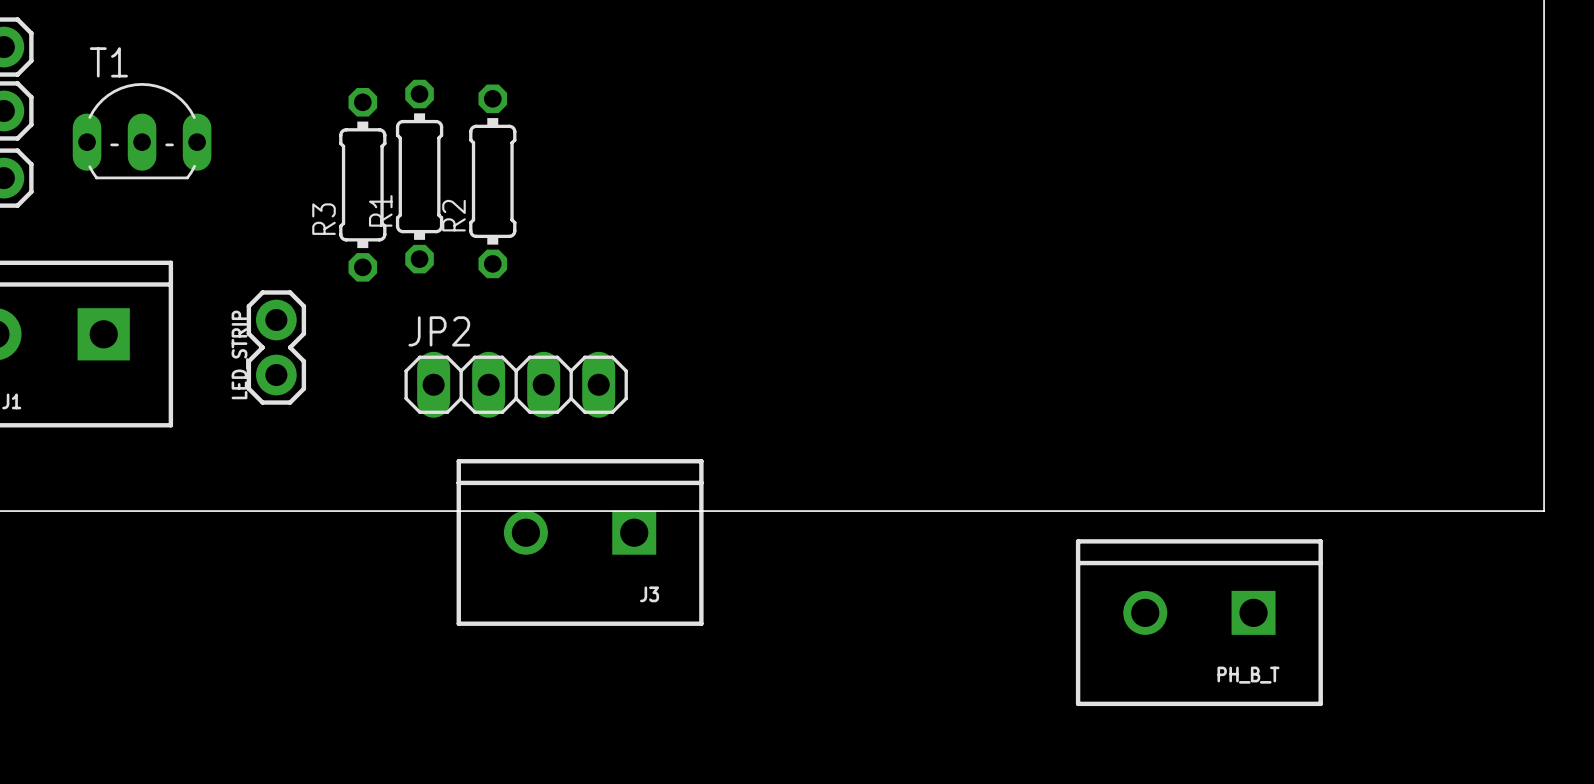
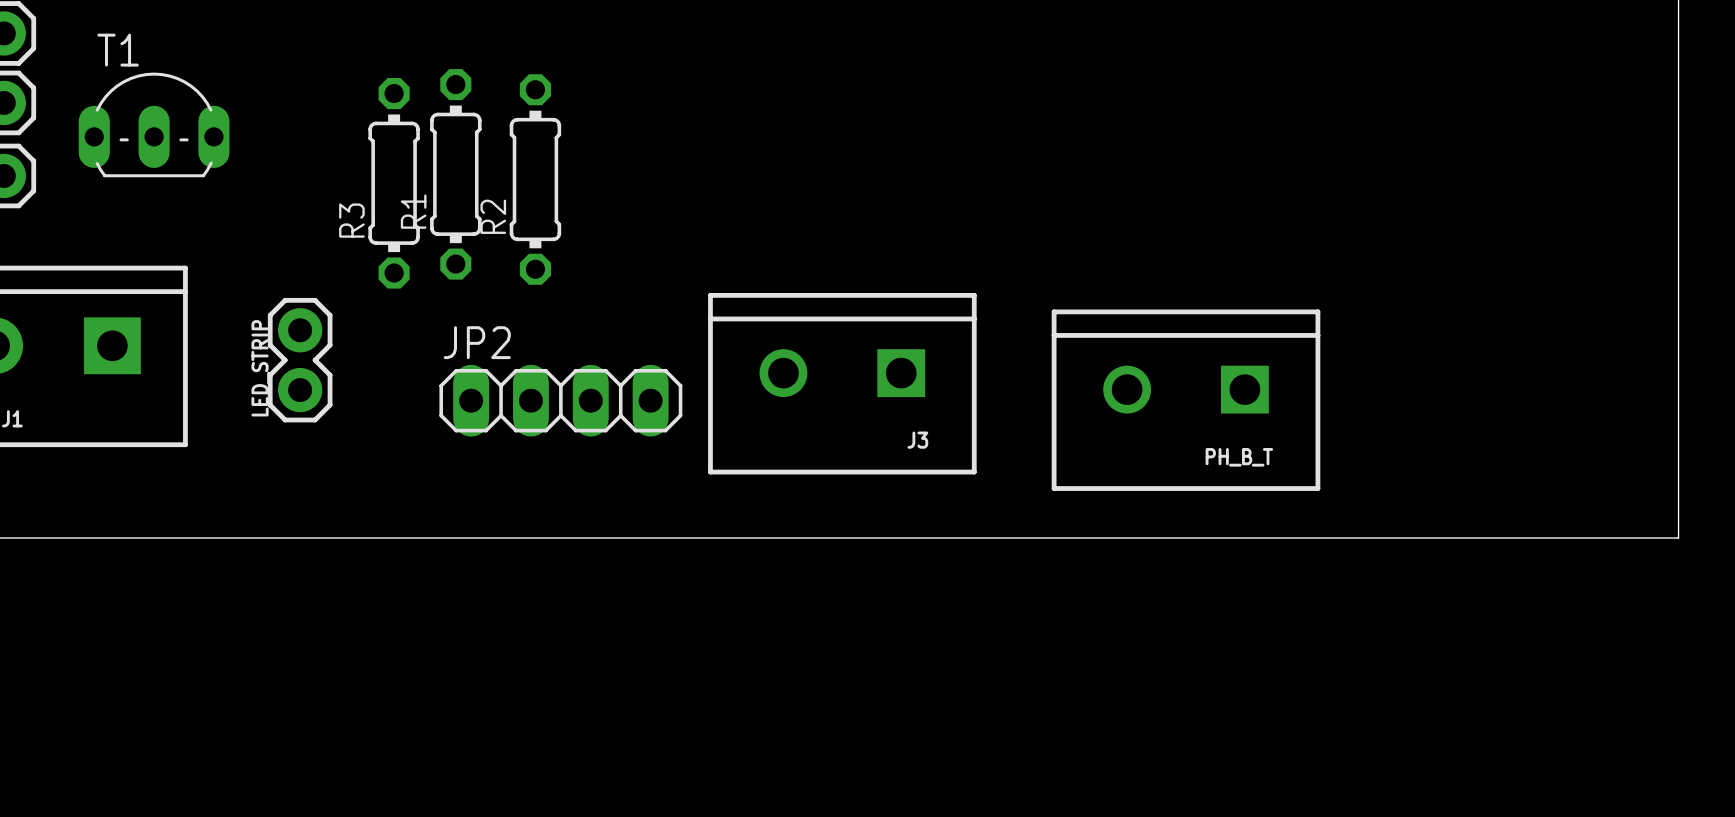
J3 position: (580, 542) -> (842, 383)
PH_B_T position: (1199, 622) -> (1186, 400)

